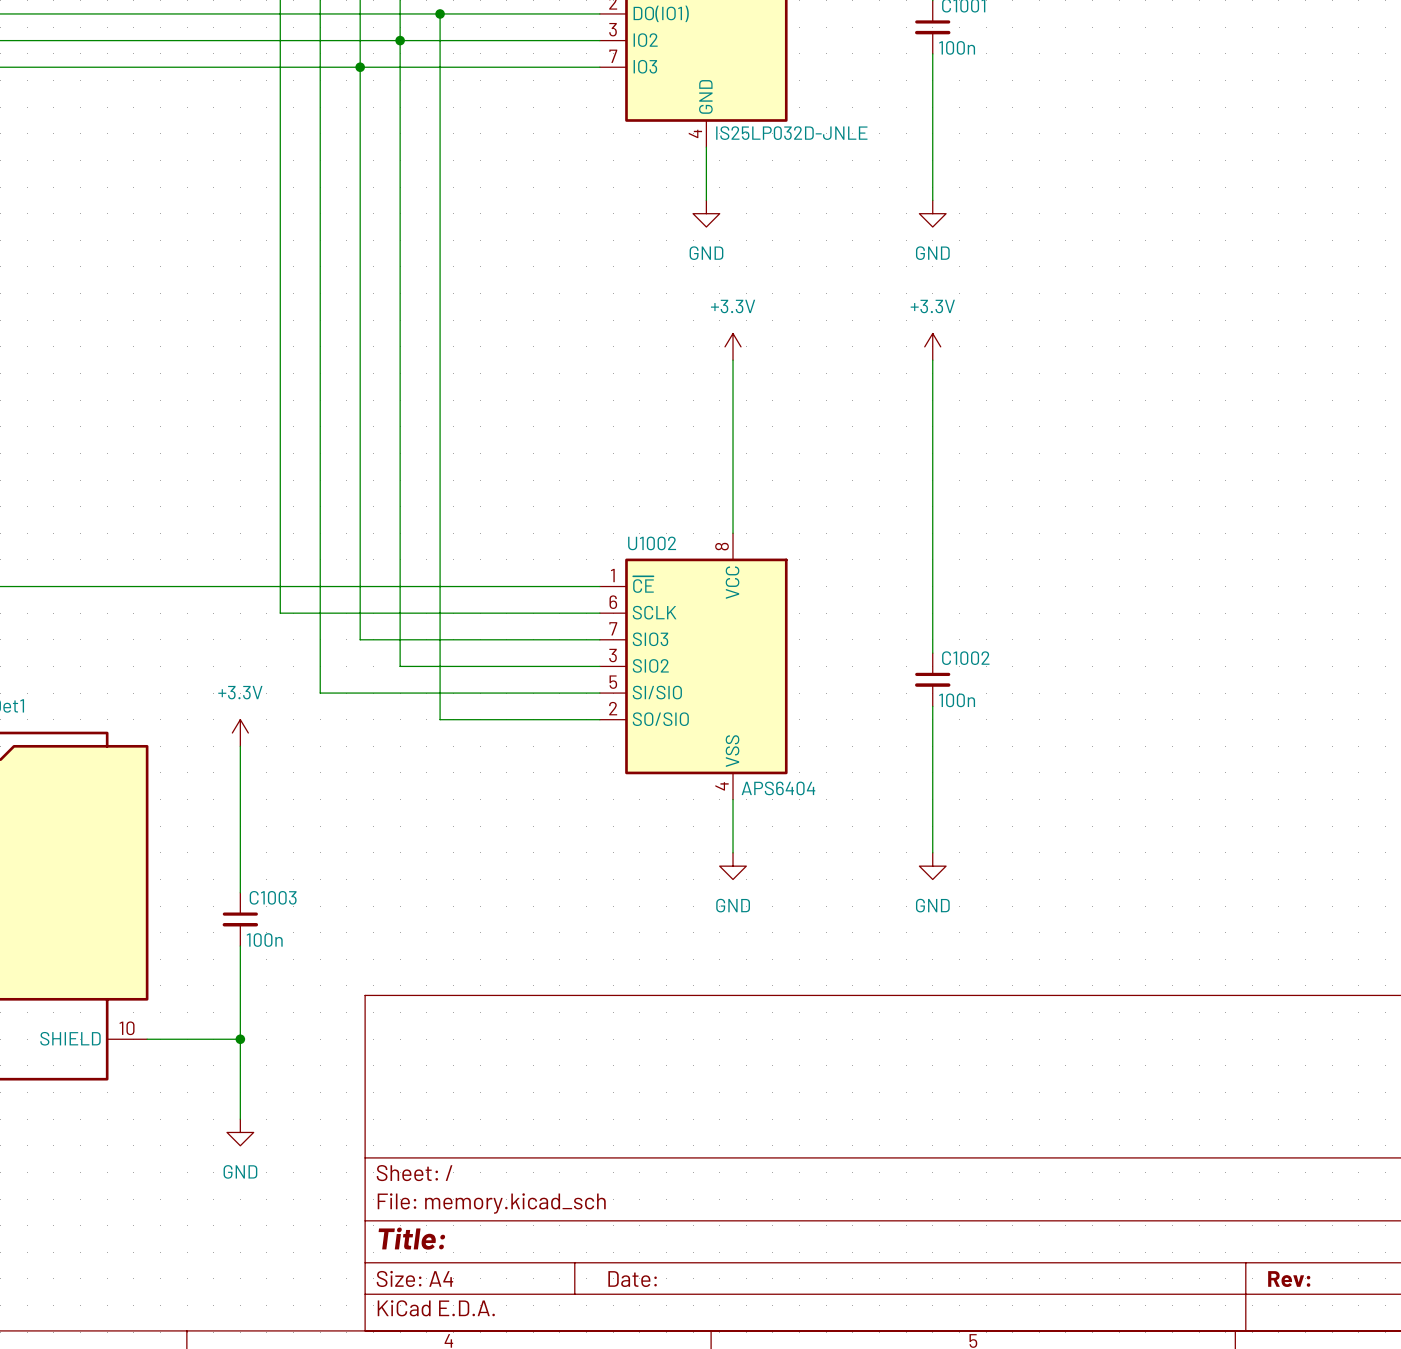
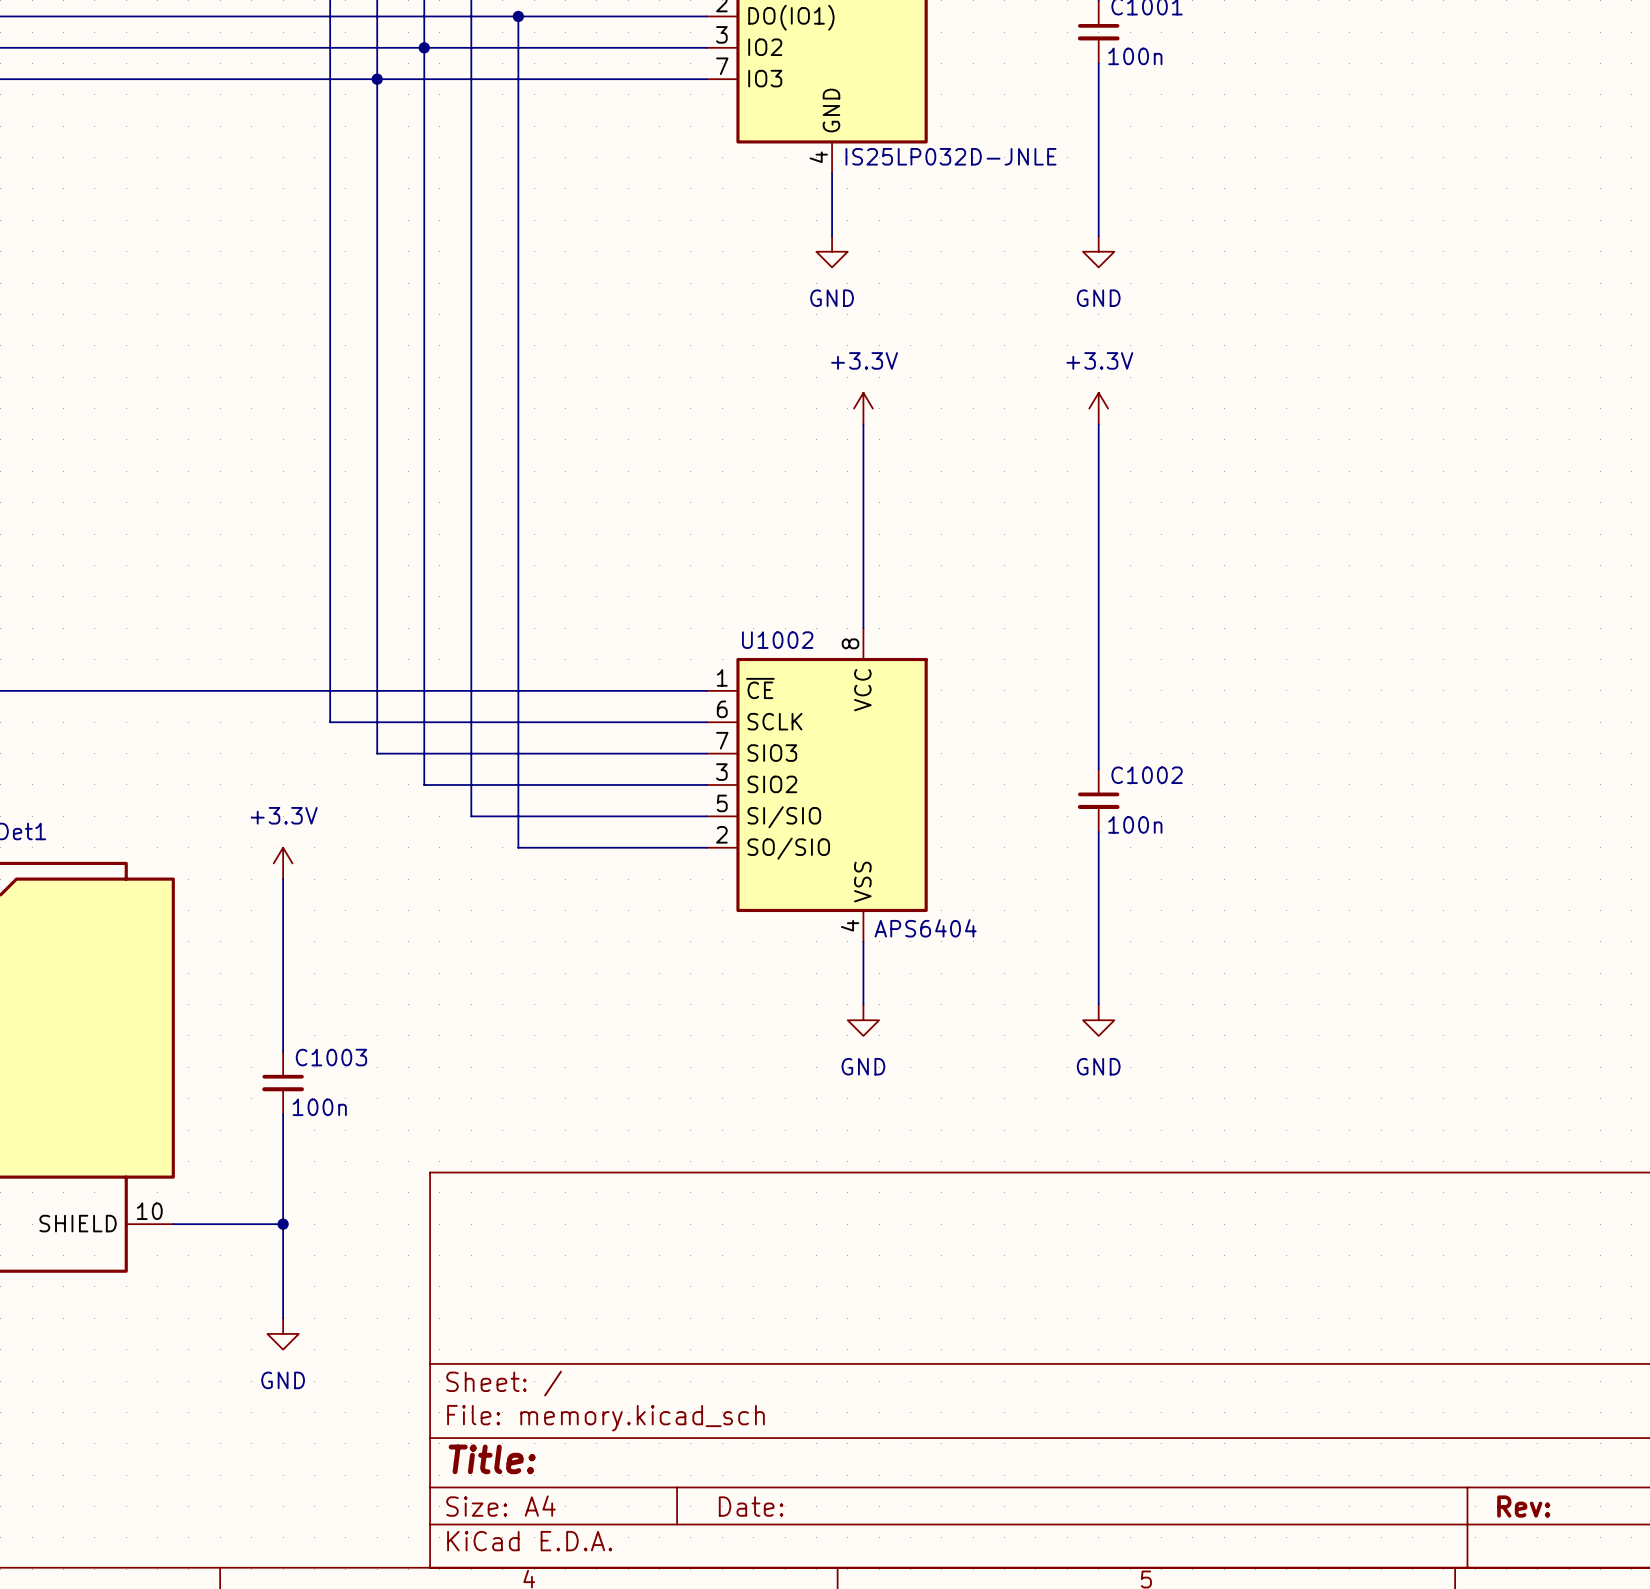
junction: none -> (424, 47)
junction: (400, 40) -> none
junction: none -> (377, 79)
junction: (360, 67) -> none
wire: (320, 639) (320, 693) (400, 693) -> (377, 753) (424, 753) (424, 784) (471, 784) (471, 816)

